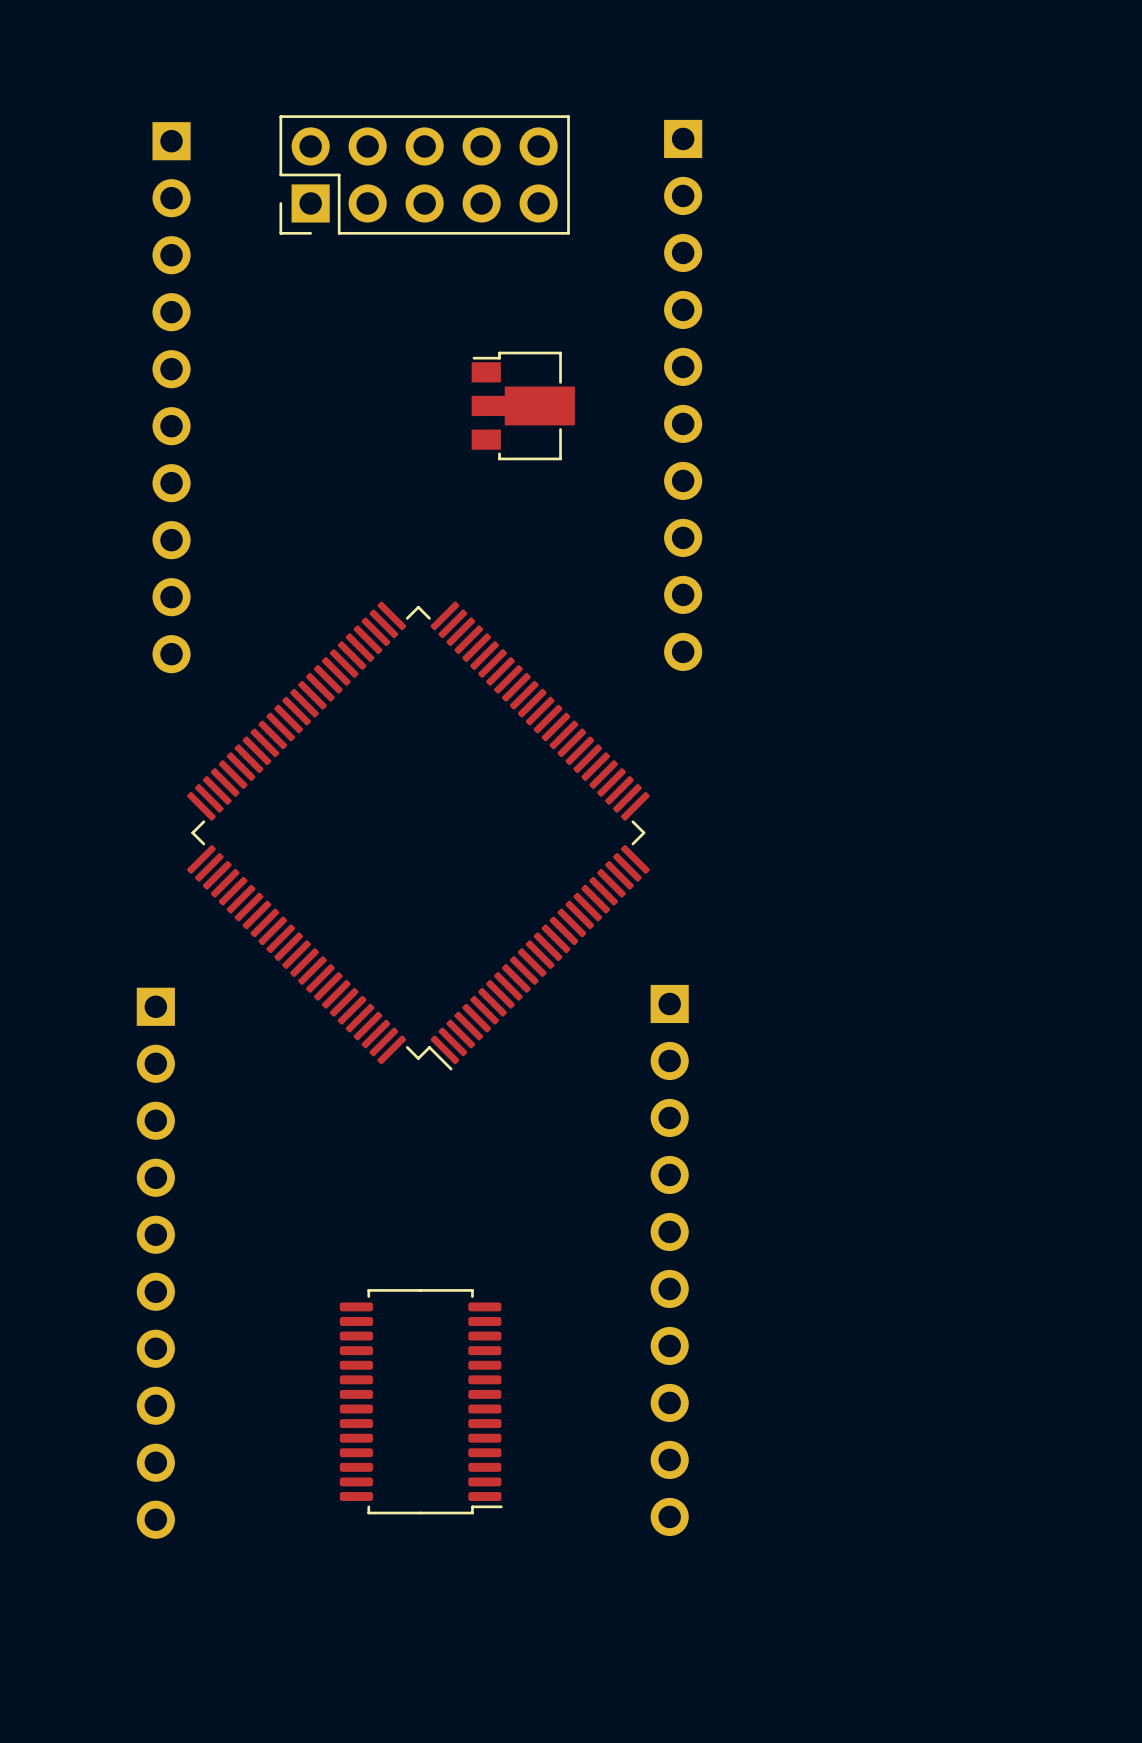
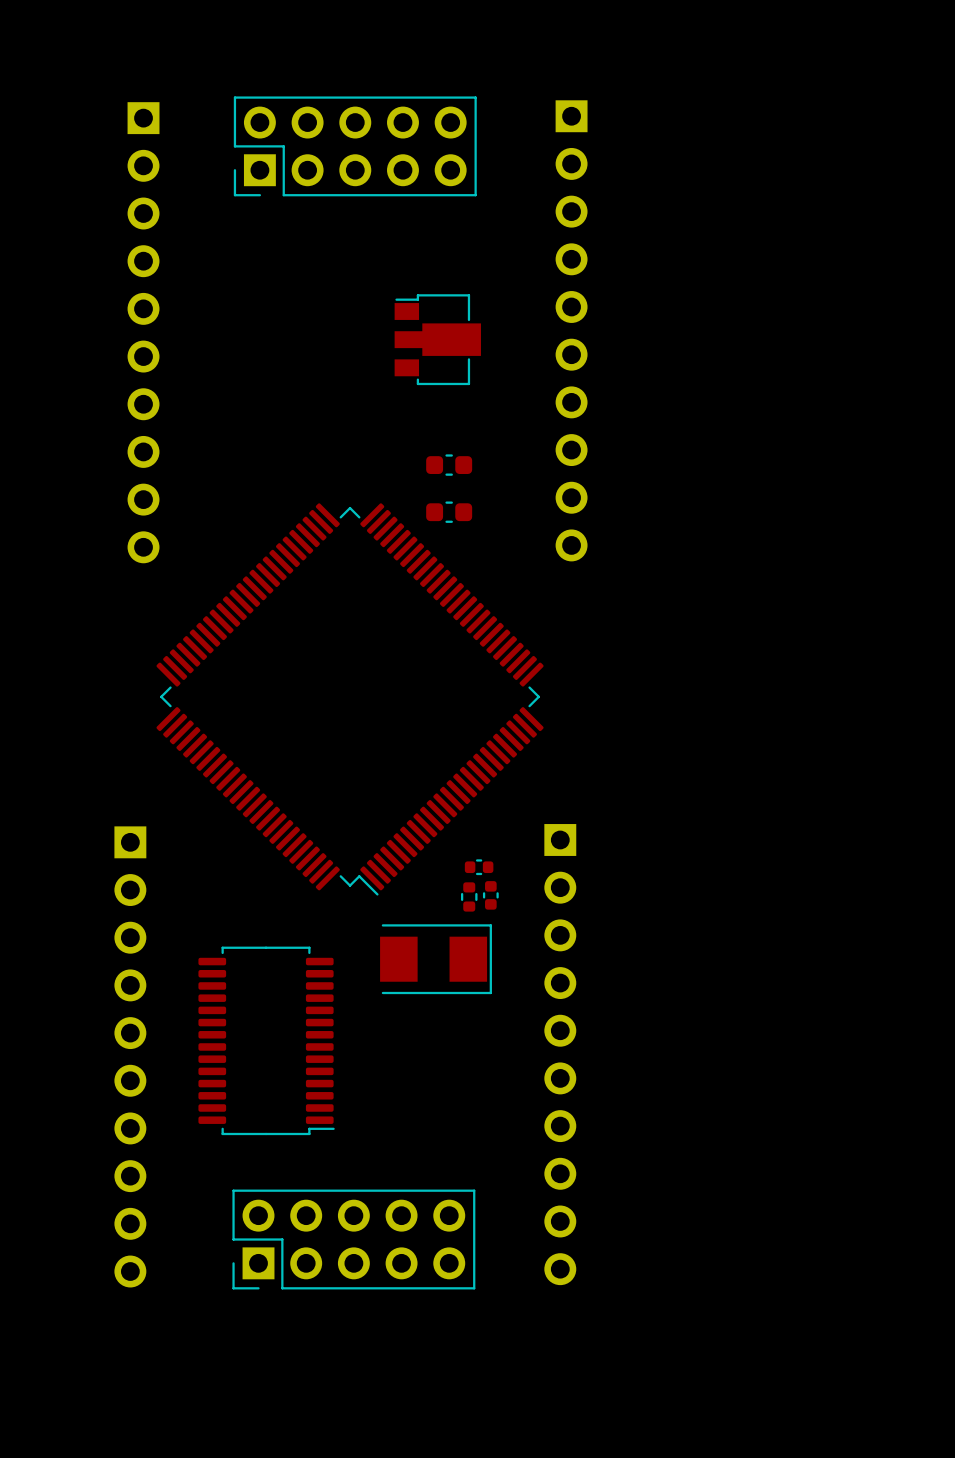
part: none -> (449, 465)
part: none -> (449, 512)
part: none -> (479, 867)
part: none -> (490, 895)
part: none -> (469, 896)
part: none -> (436, 959)
part position: (421, 1401) -> (266, 1040)
part: none -> (353, 1239)

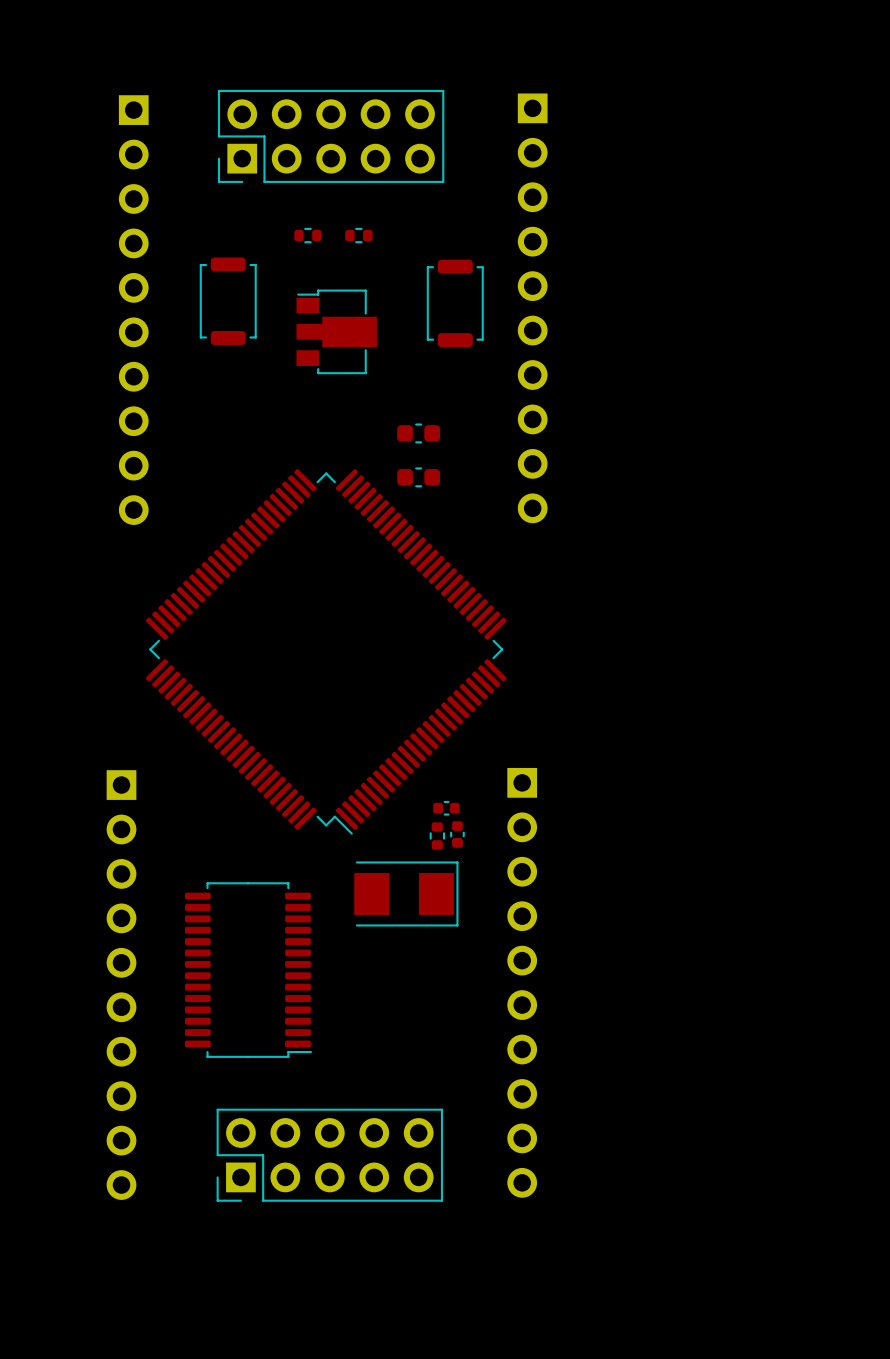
part: none -> (307, 235)
part: none -> (358, 235)
part: none -> (228, 301)
part: none -> (455, 303)
part position: (437, 339) -> (336, 331)

